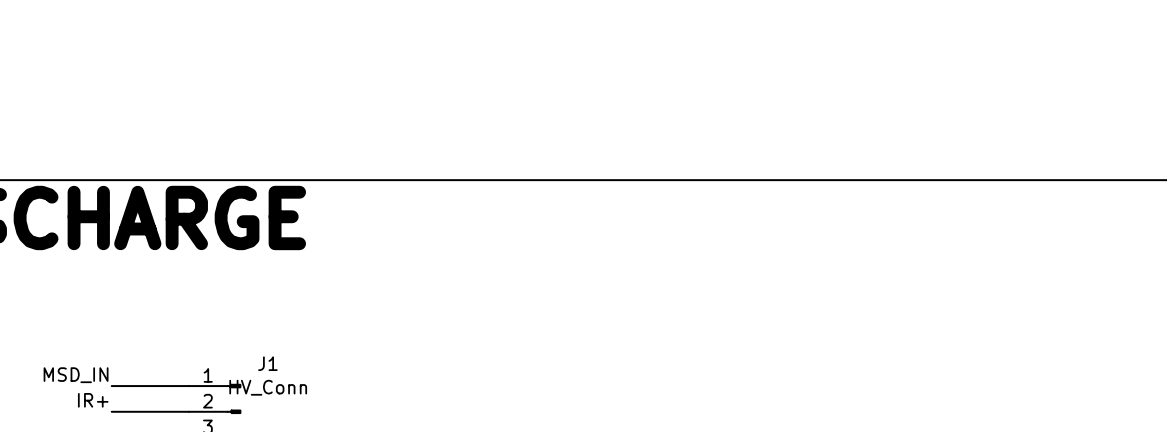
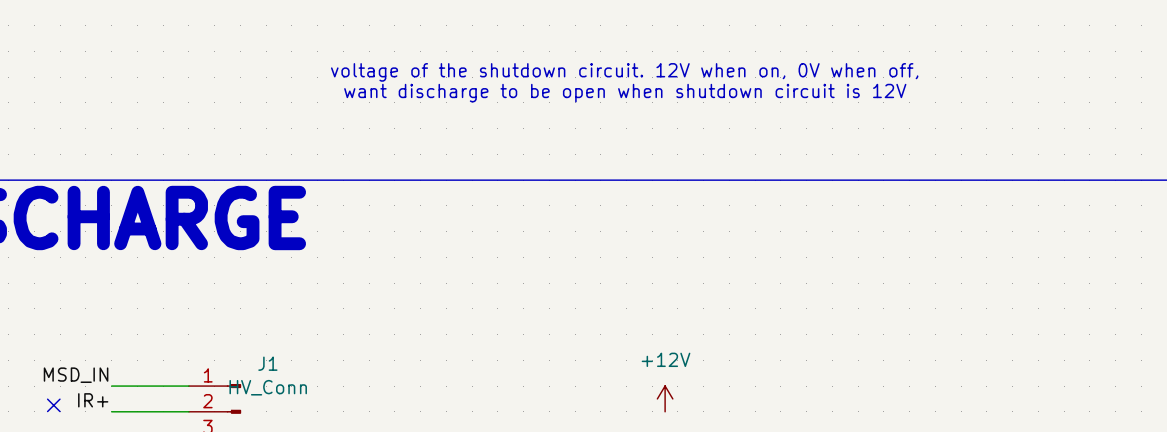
text: none -> voltage of the shutdown circuit. 12V when on, 0V when off, (624, 72)
text: none -> want discharge to be open when shutdown circuit is 12V (625, 93)
power symbol: none -> +12V (665, 398)
no-connect mark: none -> (53, 405)

